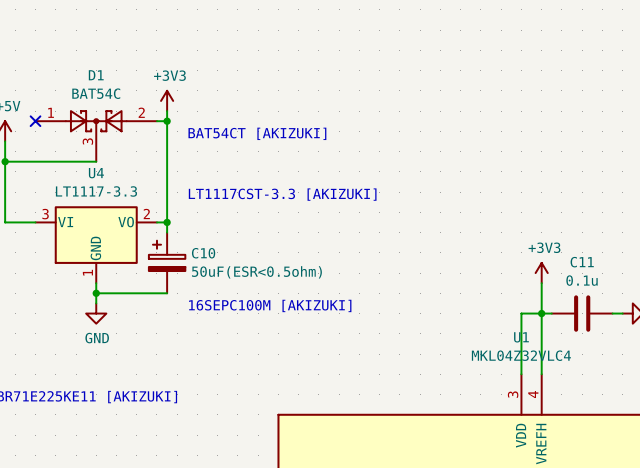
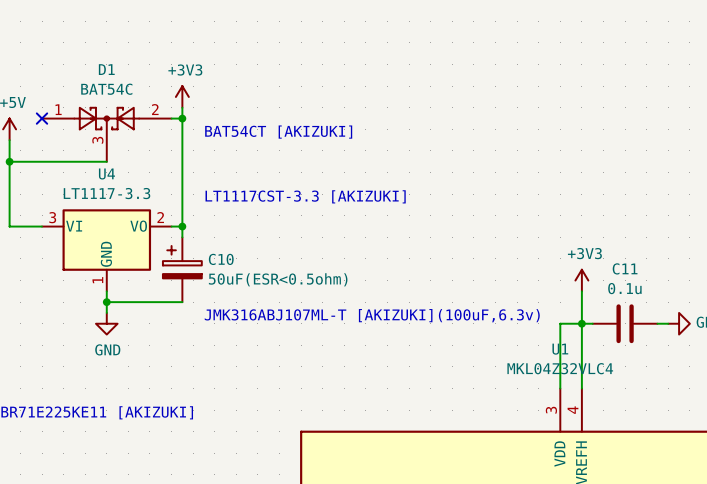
text: 16SEPC100M [AKIZUKI] (270, 305) -> JMK316ABJ107ML-T [AKIZUKI](100uF,6.3v) (372, 315)

